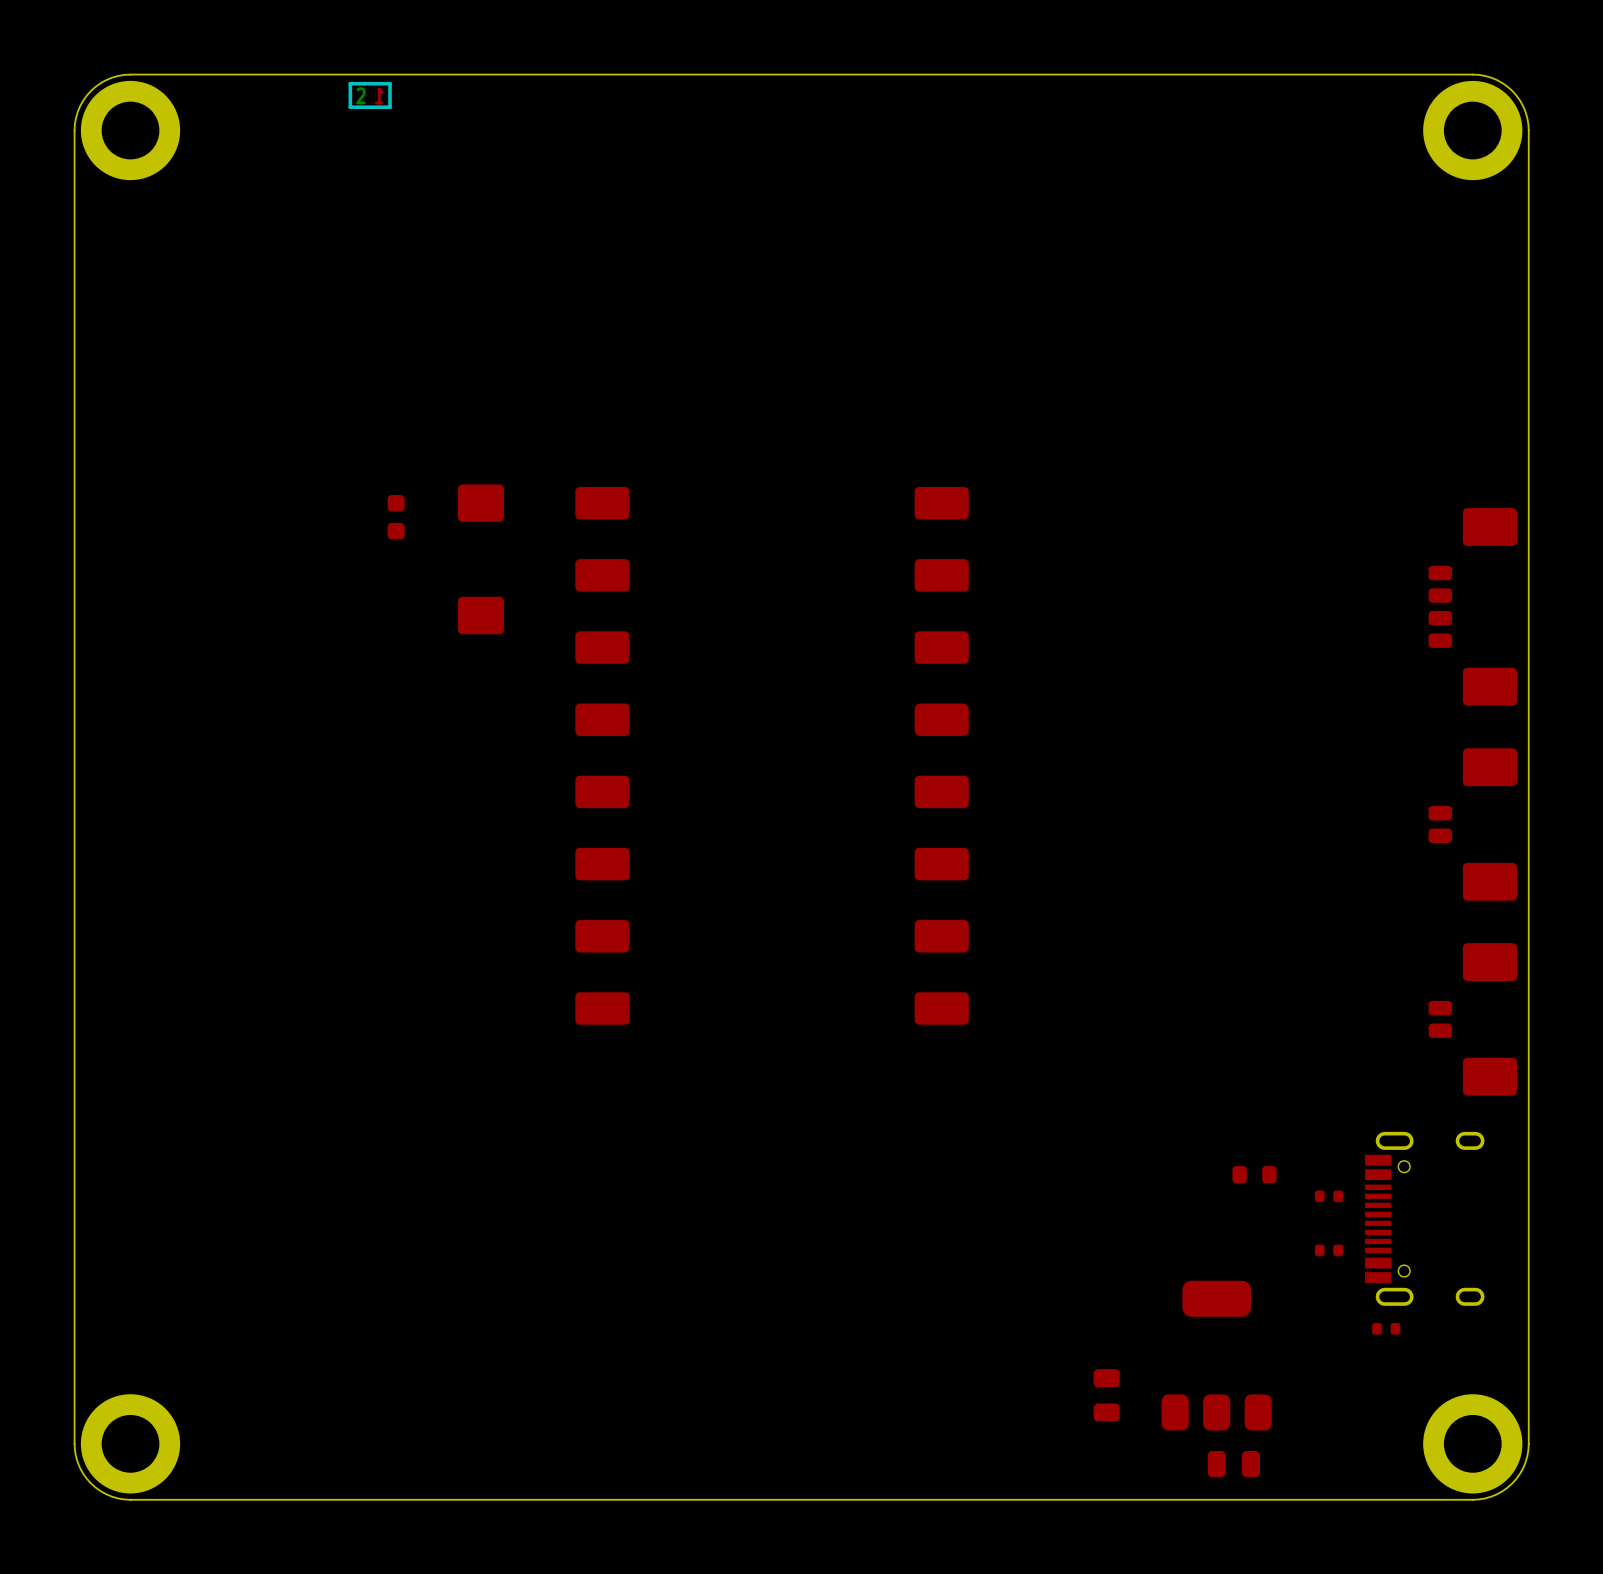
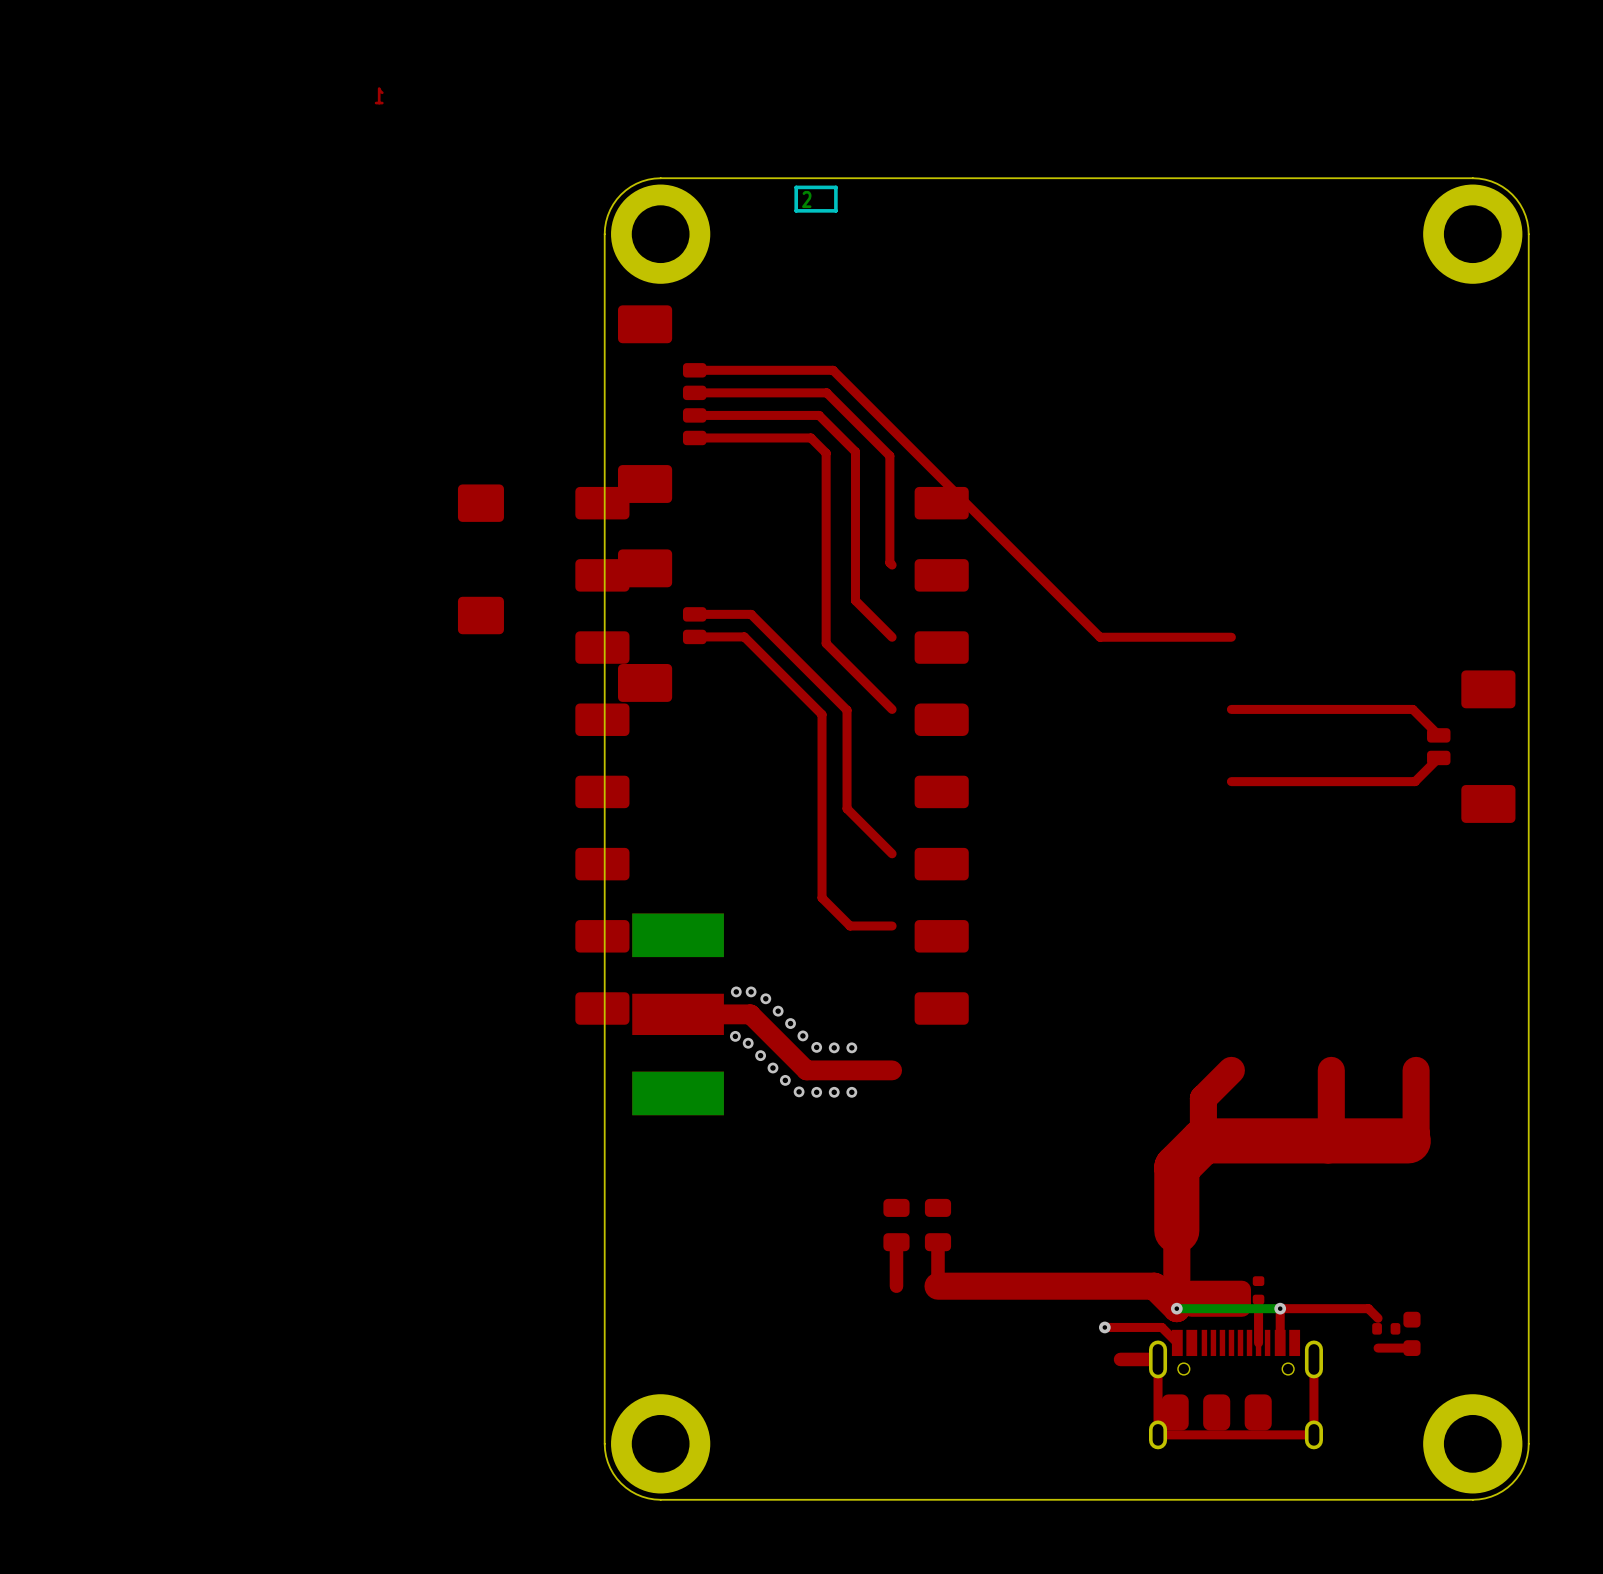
line: (390, 83) (390, 107) (350, 107) (350, 83) (390, 83) -> none
text: 2 (360, 95) -> none
part: (130, 130) -> none
part position: (1472, 130) -> (1472, 234)
line: none -> (835, 187) (835, 210) (796, 210) (796, 187) (835, 187)
text: none -> 2 (806, 199)
part: none -> (660, 234)
board edge: (1528, 234) (1528, 130) (1525, 112) (1520, 100) (1507, 86) (1497, 80) (1479, 74) (130, 74) (106, 80) (95, 86) (83, 100) (77, 112) (74, 130) (74, 1443) (77, 1462) (83, 1473) (95, 1487) (112, 1496) (124, 1499) (660, 1499) -> (1528, 234) (1523, 209) (1512, 194) (1497, 183) (1472, 178) (660, 178) (636, 183) (621, 194) (613, 204) (607, 215) (604, 234) (604, 1443) (610, 1468) (621, 1483) (636, 1494) (660, 1499)
top track: none -> (694, 370) (833, 370) (1100, 637) (1231, 637)
top track: none -> (694, 392) (826, 392) (889, 455) (889, 562) (892, 565)
part: none -> (662, 404)
top track: none -> (694, 415) (819, 415) (855, 451) (855, 600) (892, 637)
top track: none -> (694, 437) (810, 437) (826, 453) (826, 643) (892, 709)
part: (396, 517) -> none
part: (1472, 606) -> none
top track: none -> (694, 614) (751, 614) (847, 710) (847, 808) (892, 853)
part: none -> (662, 625)
top track: none -> (694, 636) (744, 636) (822, 714) (822, 897) (850, 926) (892, 926)
top track: none -> (1231, 709) (1412, 709) (1438, 735)
top track: none -> (1438, 757) (1415, 781) (1231, 781)
part position: (1472, 824) -> (1471, 746)
via: none -> (736, 991)
via: none -> (751, 991)
via: none -> (765, 998)
via: none -> (778, 1011)
top track: none -> (678, 1014) (750, 1014) (806, 1070) (892, 1070)
part: none -> (678, 1014)
part: (1472, 1019) -> none
via: none -> (790, 1023)
via: none -> (802, 1035)
via: none -> (735, 1036)
via: none -> (748, 1043)
via: none -> (816, 1047)
via: none -> (834, 1047)
via: none -> (851, 1047)
via: none -> (760, 1055)
via: none -> (772, 1068)
top track: none -> (1231, 1070) (1203, 1098) (1203, 1140)
top track: none -> (1331, 1070) (1331, 1137) (1328, 1140)
top track: none -> (1416, 1070) (1416, 1133) (1408, 1140) (1203, 1140)
via: none -> (785, 1080)
via: none -> (799, 1091)
via: none -> (816, 1092)
via: none -> (834, 1092)
via: none -> (851, 1092)
top track: none -> (1203, 1140) (1176, 1167) (1176, 1308) (1154, 1286) (937, 1286) (937, 1242)
part: (1254, 1174) -> none
part: (1329, 1196) -> none
part rotation: 0° (1424, 1218) -> 90° clockwise (1235, 1389)
part position: (1424, 1218) -> (1235, 1389)
part: none -> (896, 1225)
part: none -> (937, 1225)
top track: none -> (896, 1242) (896, 1286)
part: (1328, 1250) -> none
part: none -> (1258, 1290)
top track: none -> (1258, 1299) (1258, 1342)
via: none -> (1176, 1308)
bottom track: none -> (1280, 1308) (1176, 1308)
via: none -> (1280, 1308)
top track: none -> (1378, 1318) (1368, 1308) (1280, 1308) (1280, 1342)
top track: none -> (1104, 1327) (1161, 1327) (1177, 1342)
via: none -> (1104, 1327)
part: none -> (1411, 1333)
top track: none -> (1411, 1348) (1378, 1348)
top track: none -> (1313, 1359) (1313, 1434) (1158, 1434) (1158, 1359) (1120, 1359)
part: (1106, 1395) -> none
part: (130, 1443) -> none
part: none -> (660, 1443)
part: (1233, 1464) -> none

